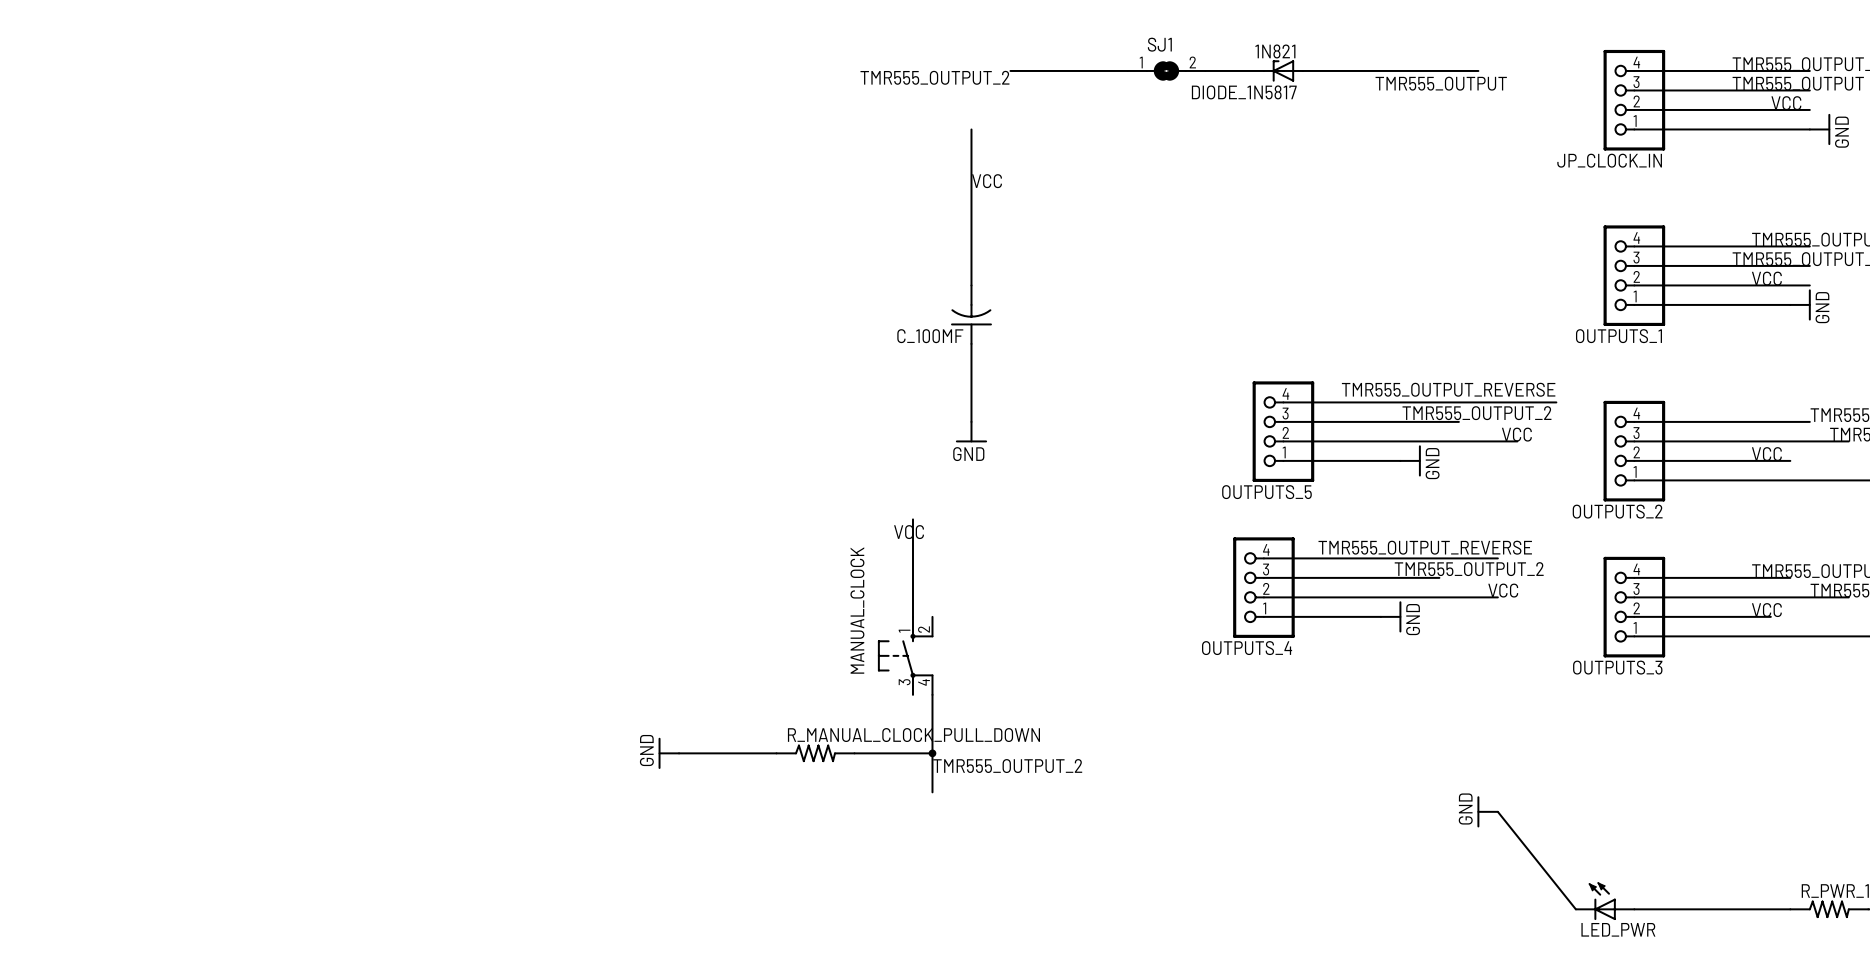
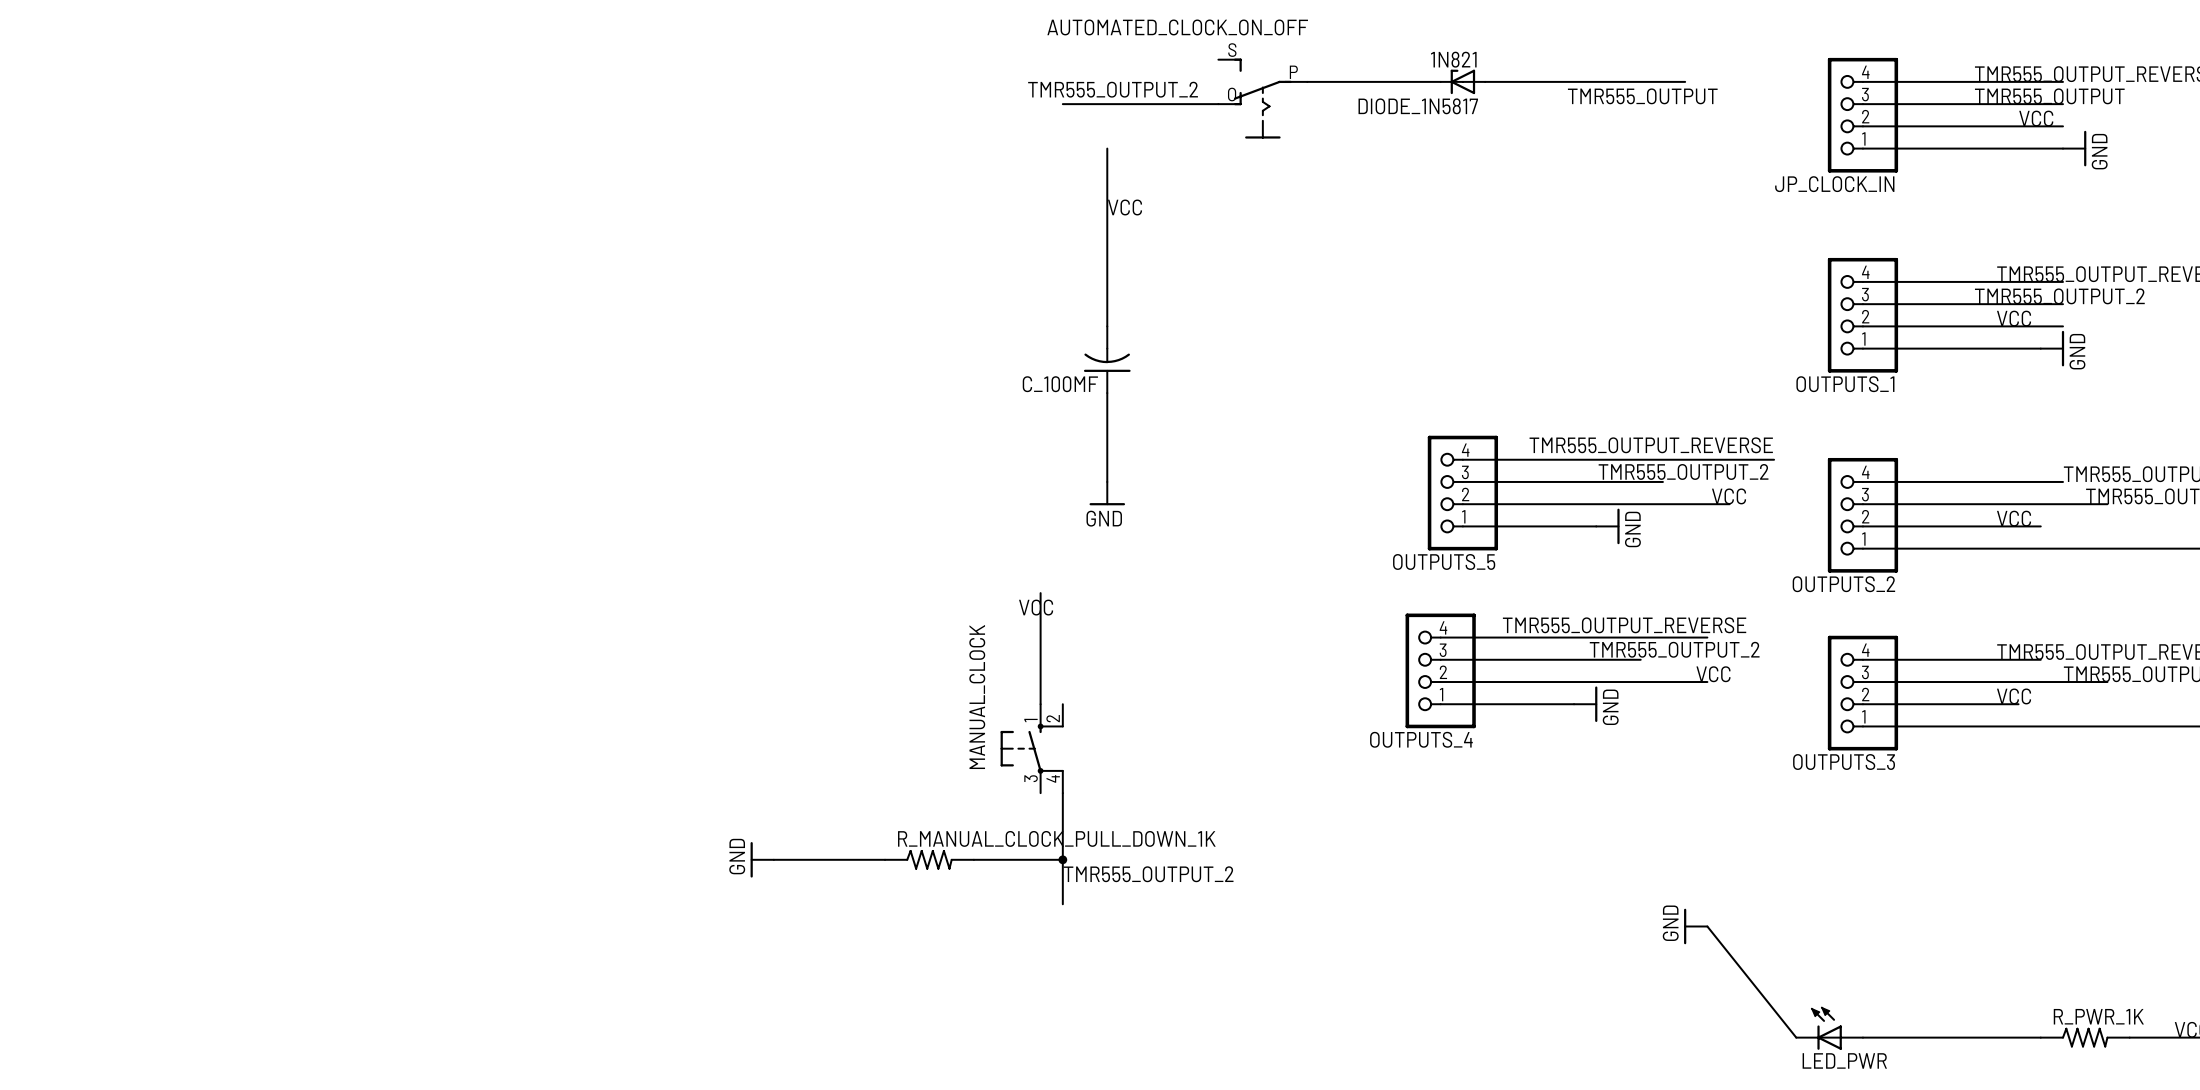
wire: (1010, 70) (1127, 70) -> none
SJ1: (1166, 70) -> none
label position: TMR555_OUTPUT_2 (934, 77) -> TMR555_OUTPUT_2 (1113, 89)
AUTOMATED_CLOCK_ON_OFF: none -> (1262, 98)
wire: none -> (1062, 104) (1218, 104)
R_MANUAL_CLOCK_PULL_DOWN name: R_MANUAL_CLOCK_PULL_DOWN (913, 735) -> R_MANUAL_CLOCK_PULL_DOWN_1K (1056, 838)

